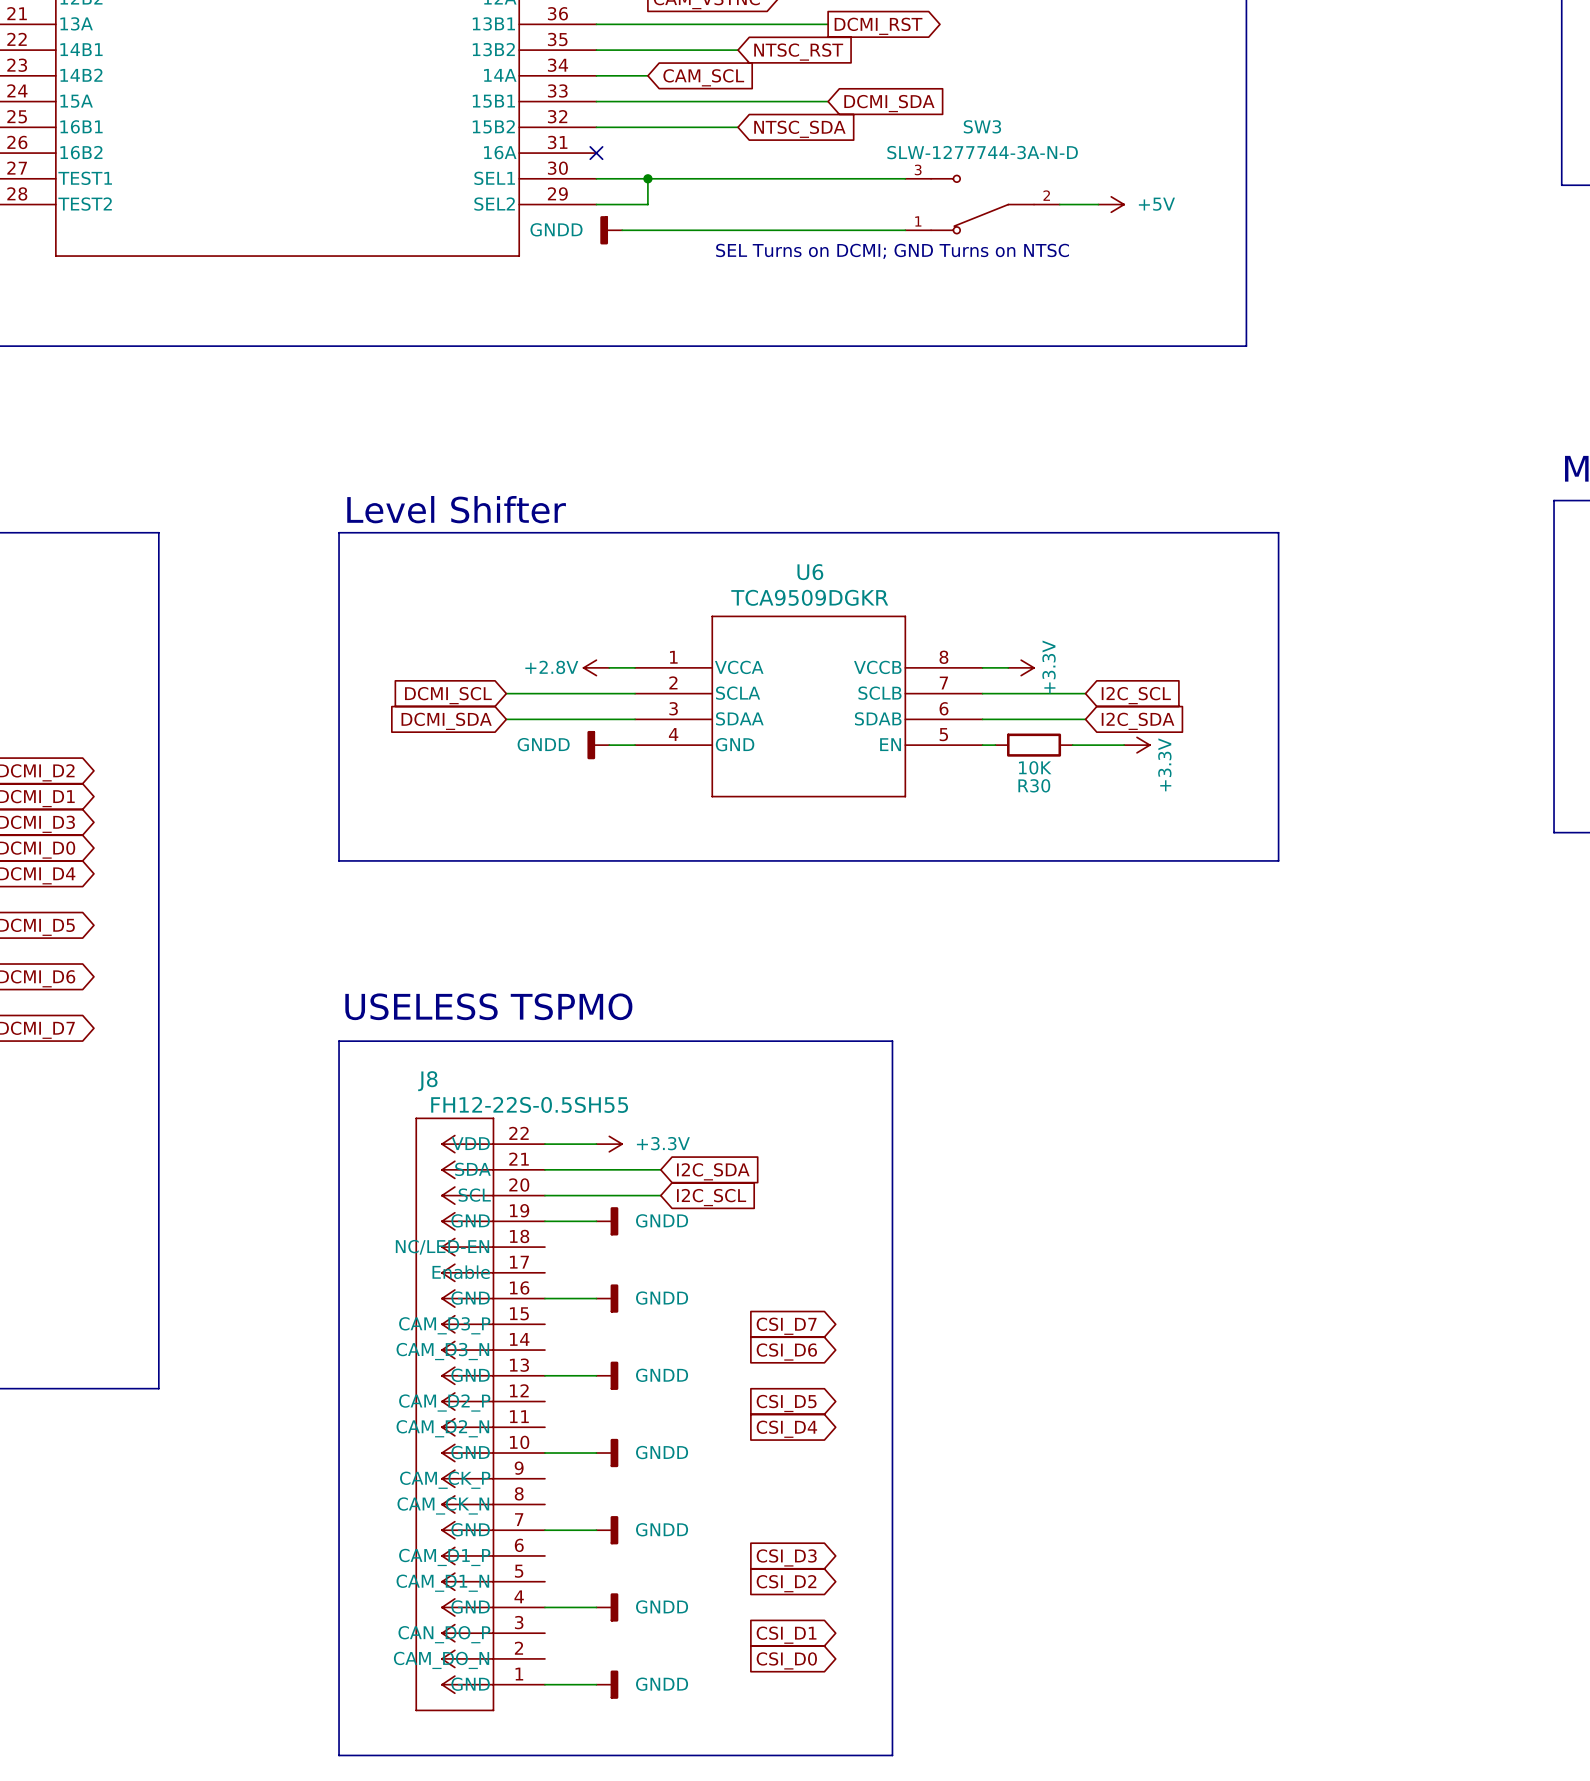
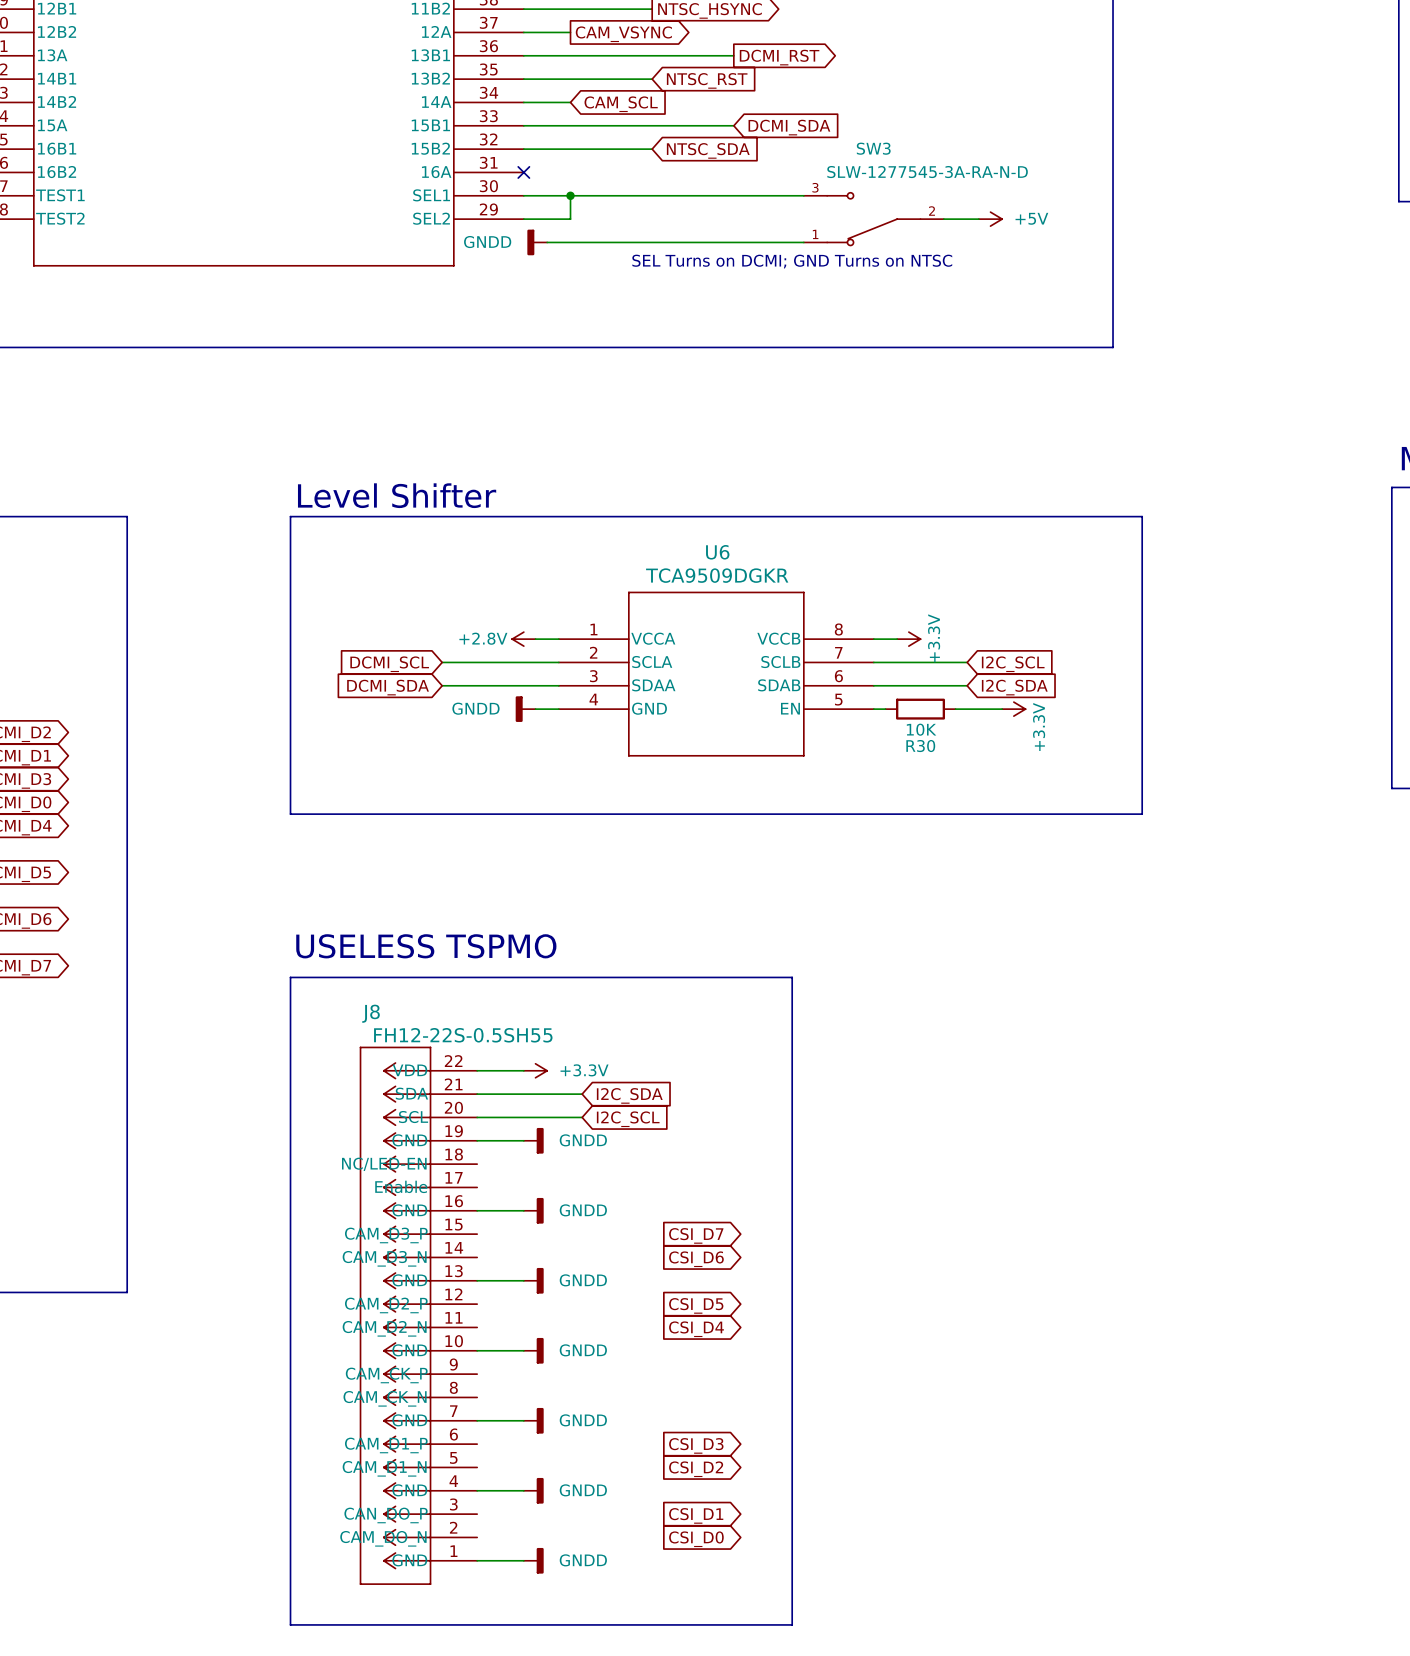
SW3 value: SLW-1277744-3A-N-D (982, 152) -> SLW-1277545-3A-RA-N-D (927, 172)

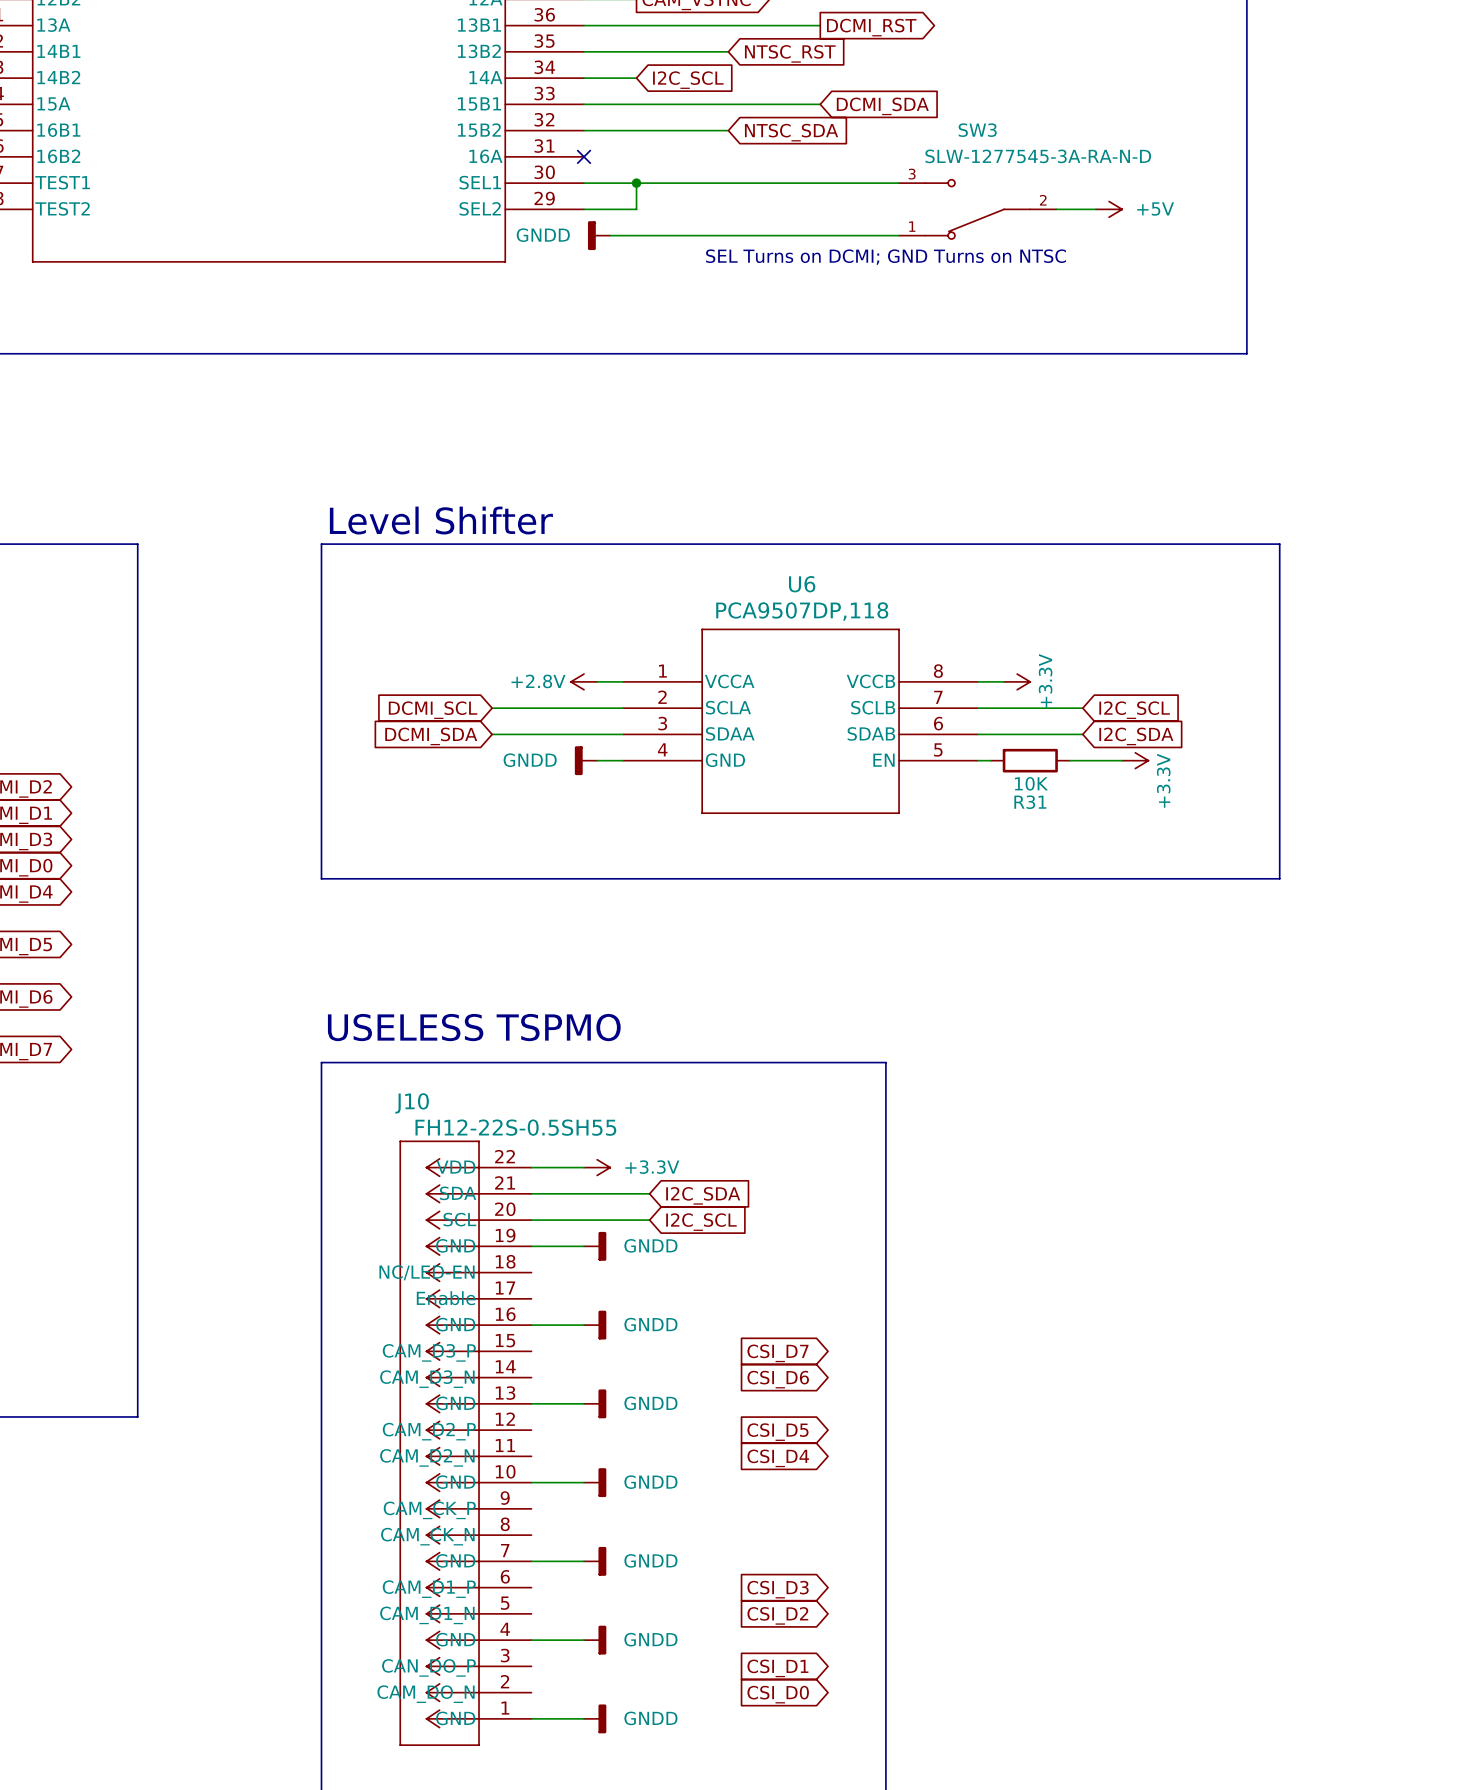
global label: CAM_SCL (621, 104) -> I2C_SCL (688, 80)
U6 value: TCA9509DGKR (717, 575) -> PCA9507DP,118 (802, 611)
R30 name: R30 (920, 746) -> R31 (1030, 802)
J8 name: J8 (371, 1013) -> J10 (412, 1103)

